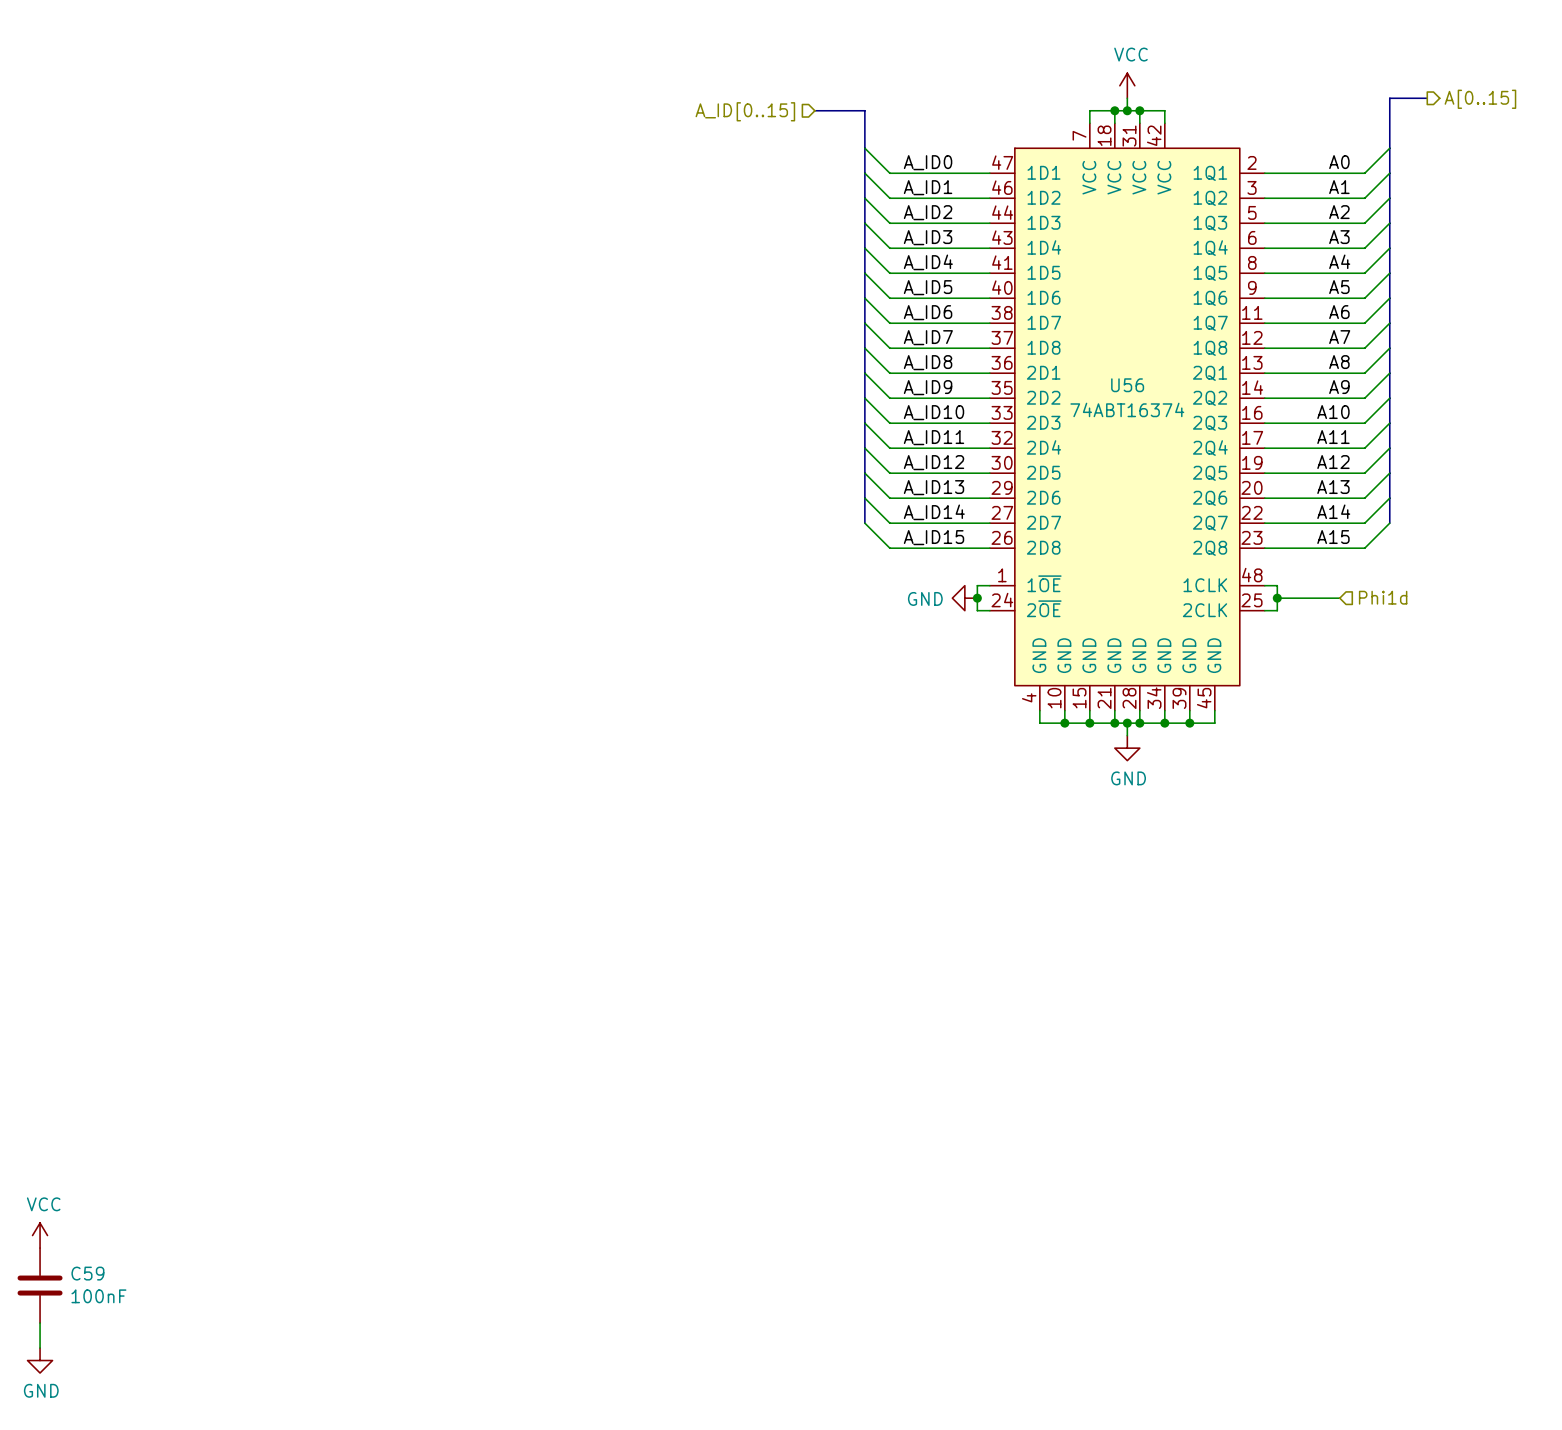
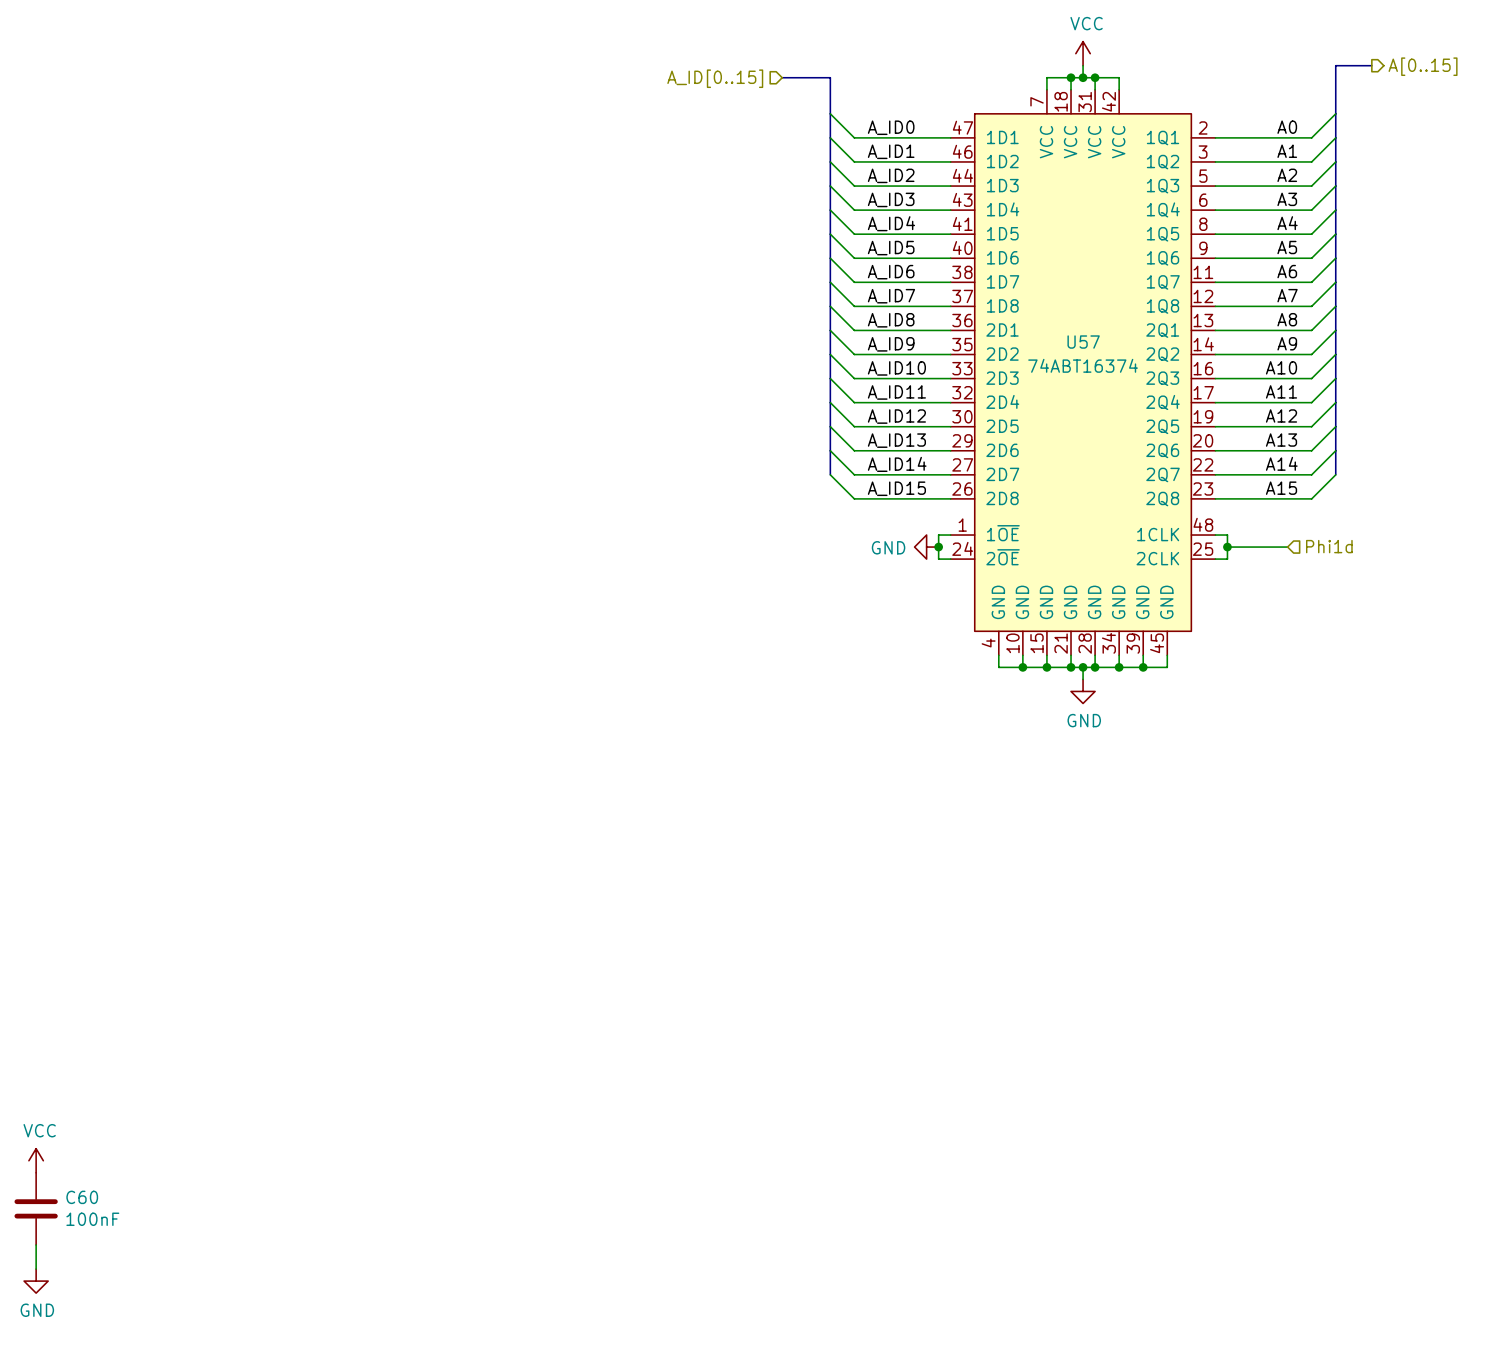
U56 name: U56 (1127, 385) -> U57 (1083, 342)
C59 name: C59 (87, 1273) -> C60 (82, 1197)

